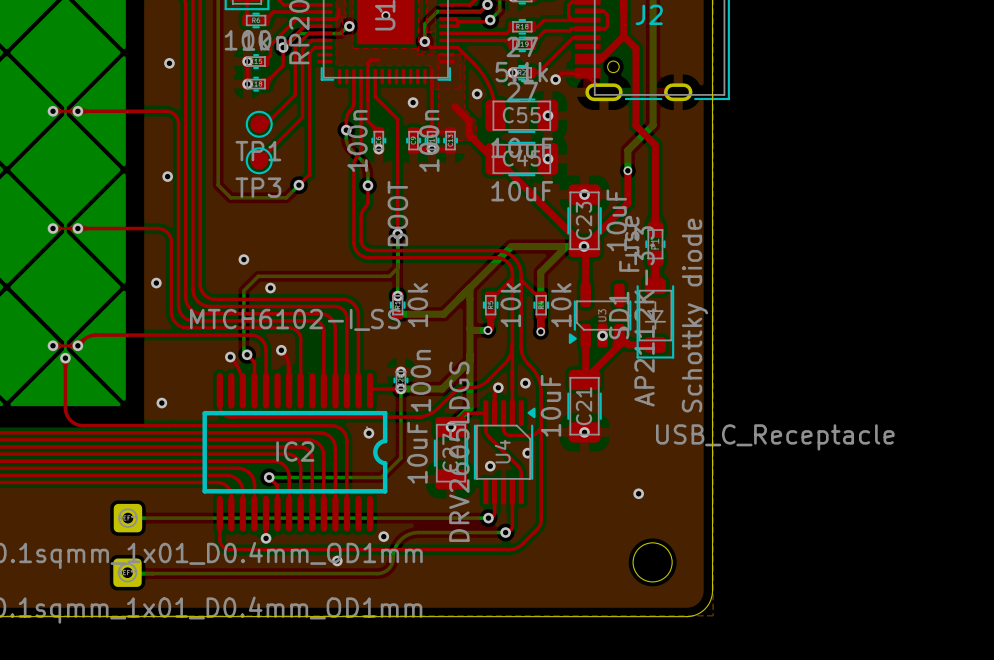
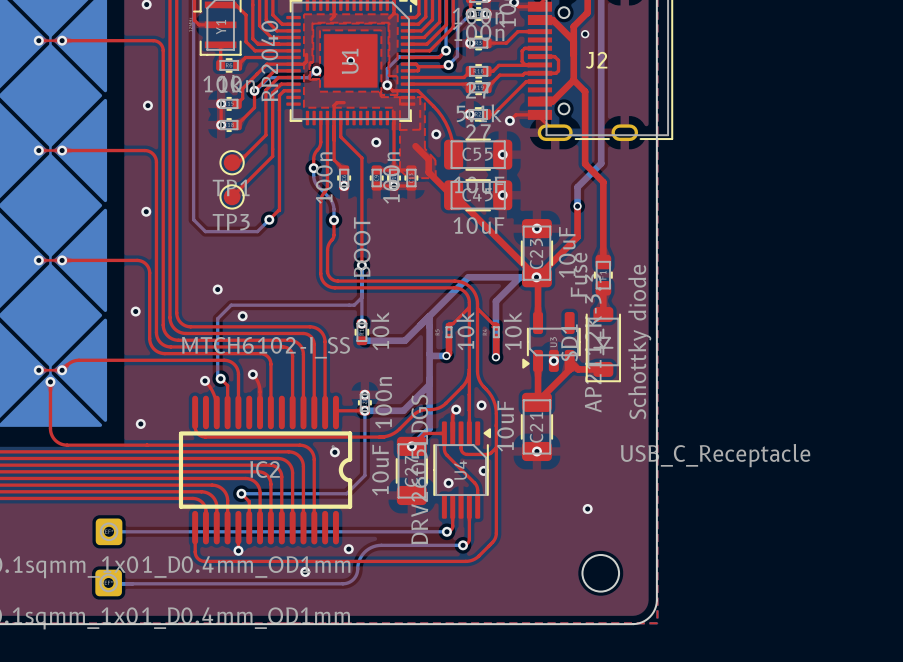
part footprint: [482, 291, 499, 320] -> [445, 323, 453, 342]
part footprint: [533, 291, 550, 320] -> [493, 323, 500, 342]

